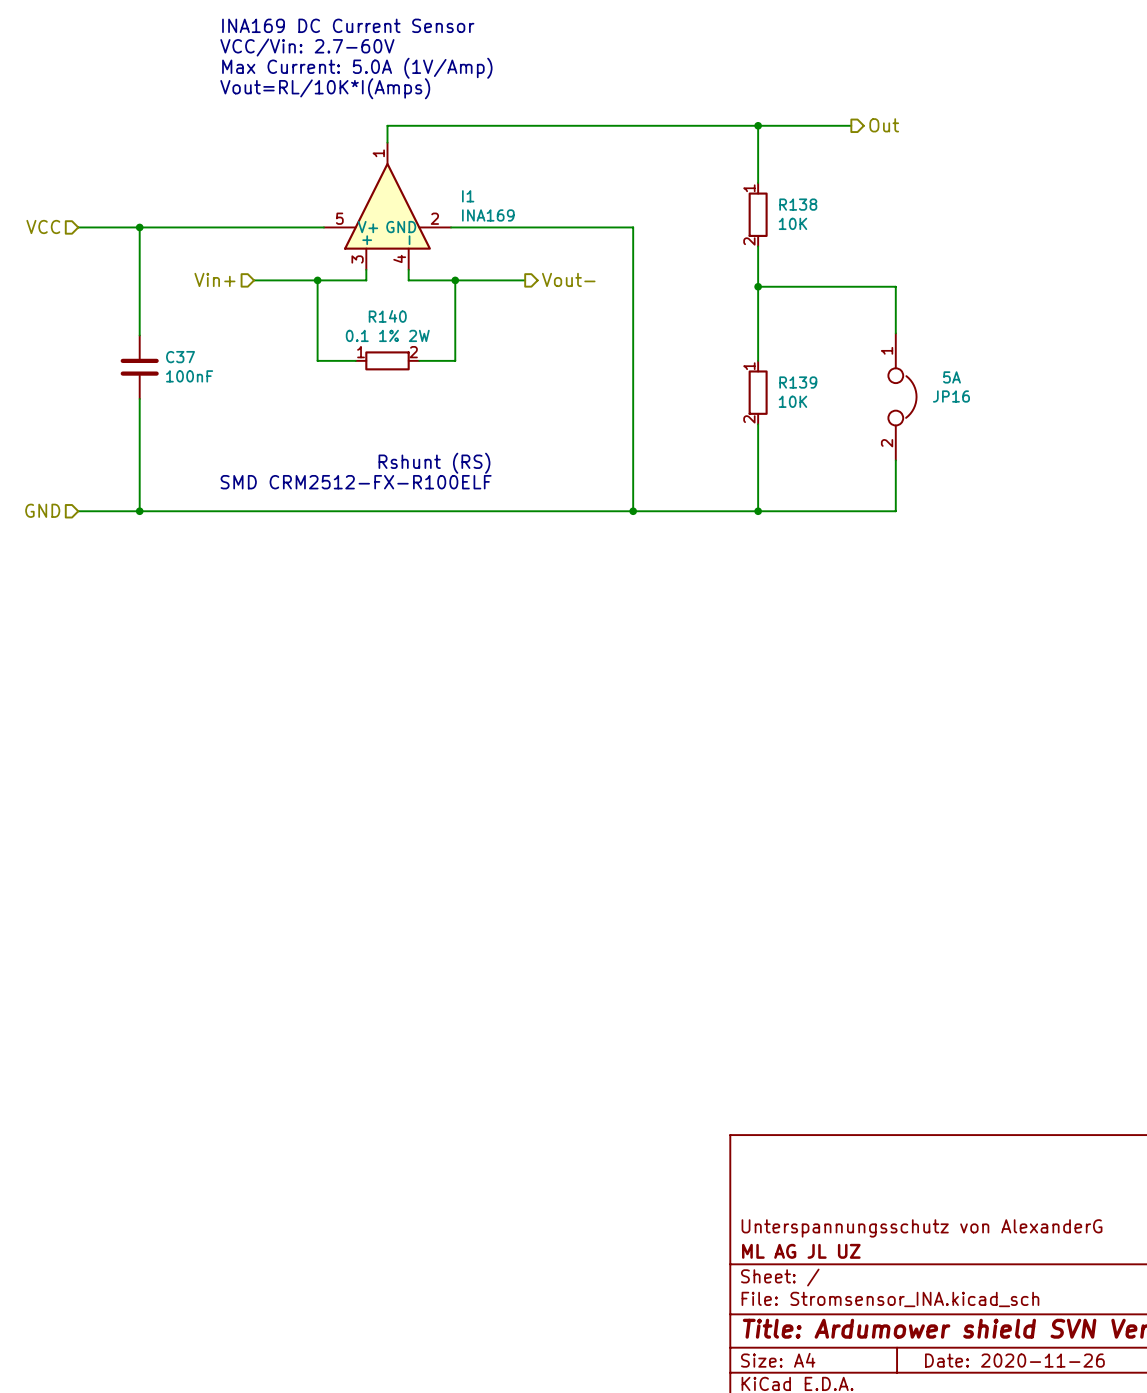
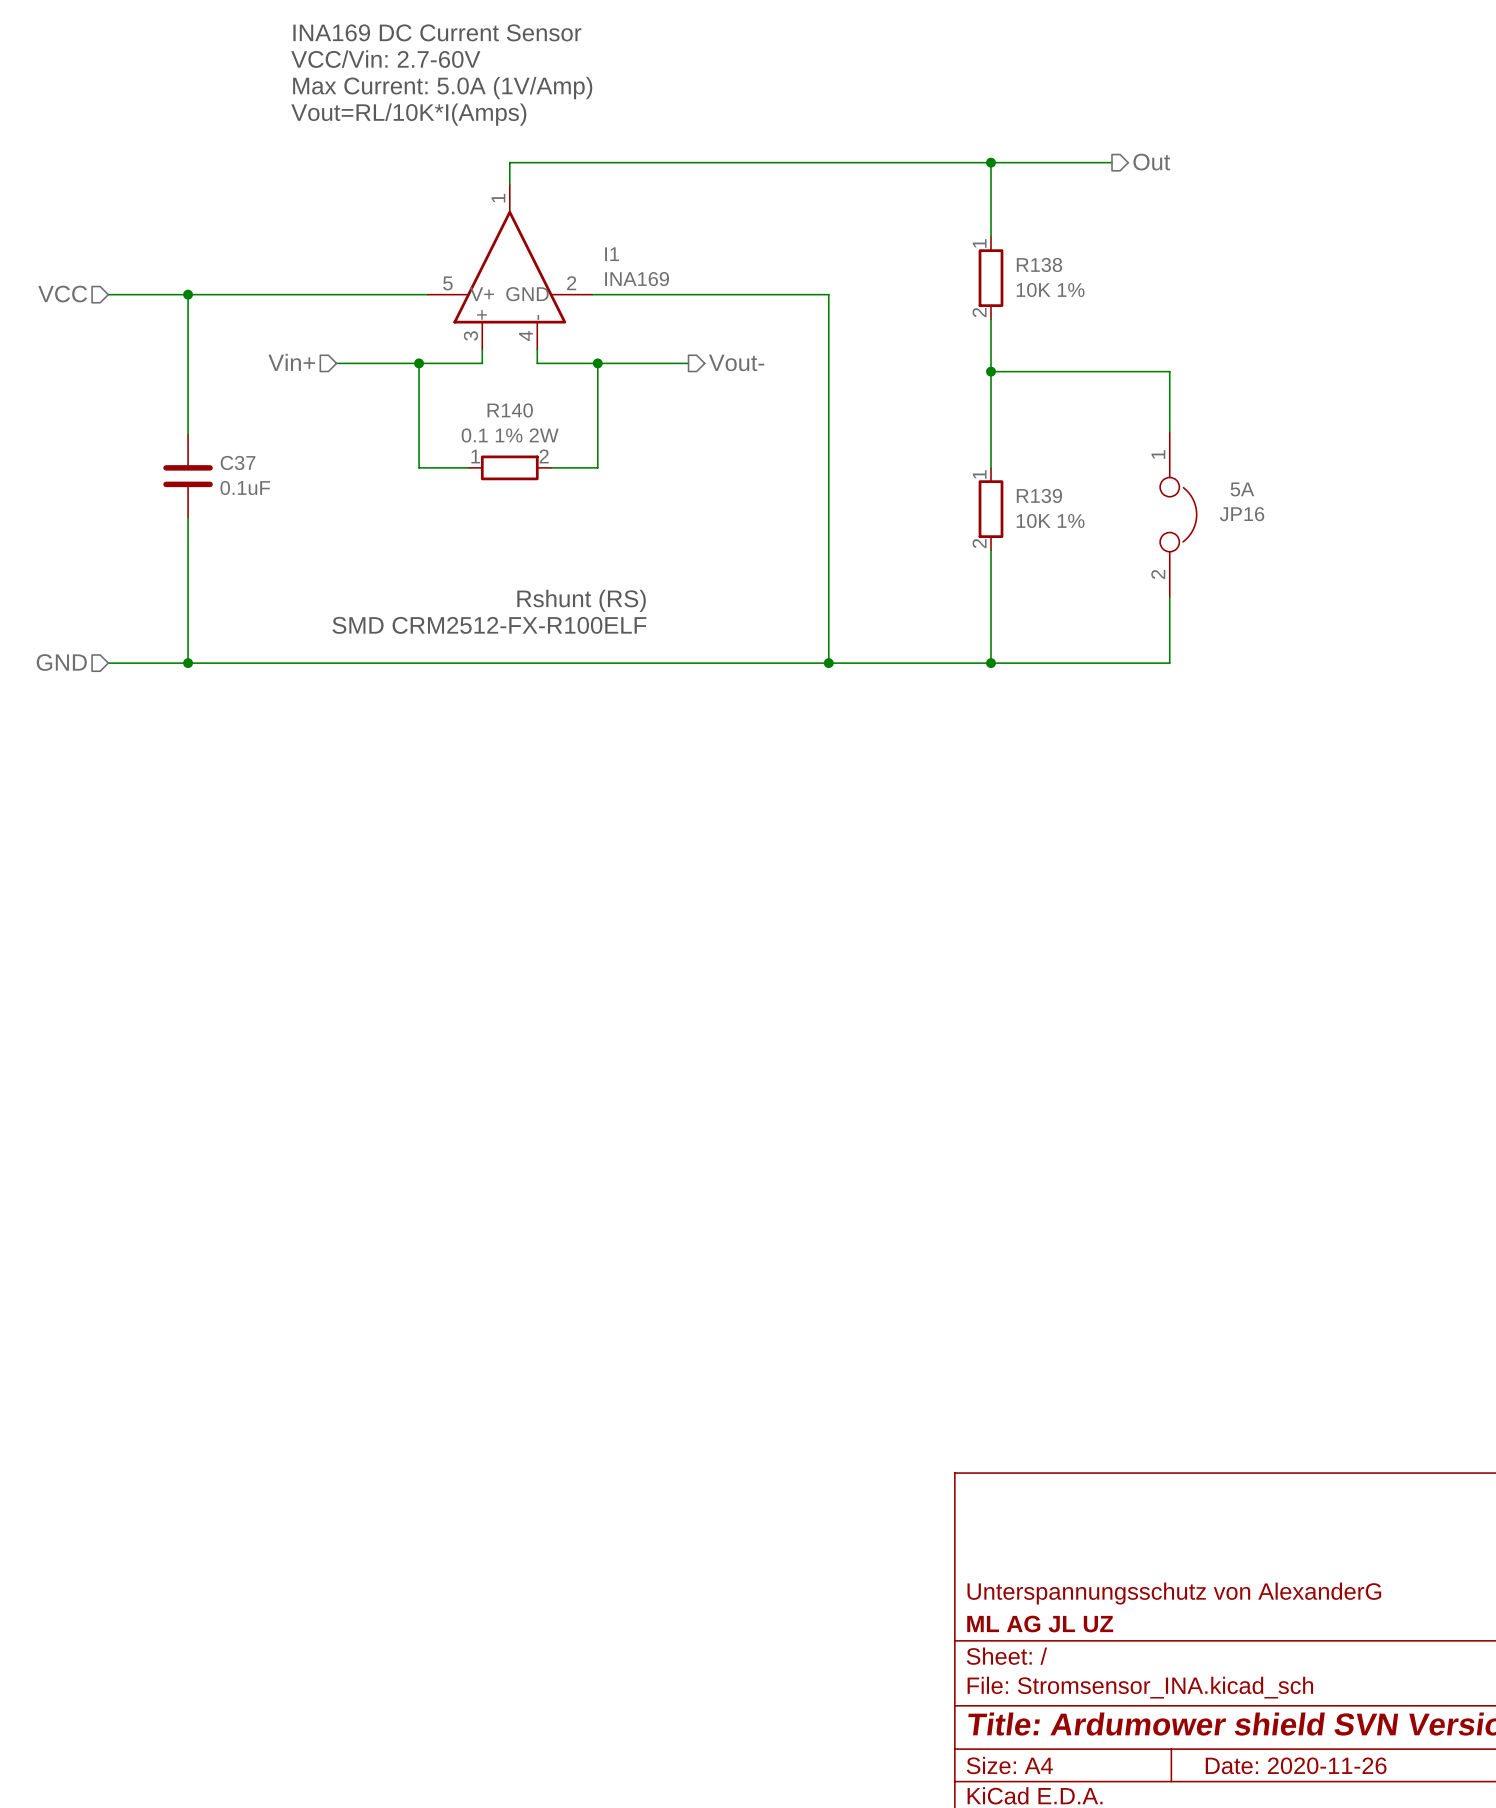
R138 value: 10K (792, 223) -> 10K 1% (1050, 290)
C37 value: 100nF (189, 376) -> 0.1uF (245, 487)
R139 value: 10K (792, 401) -> 10K 1% (1050, 520)

